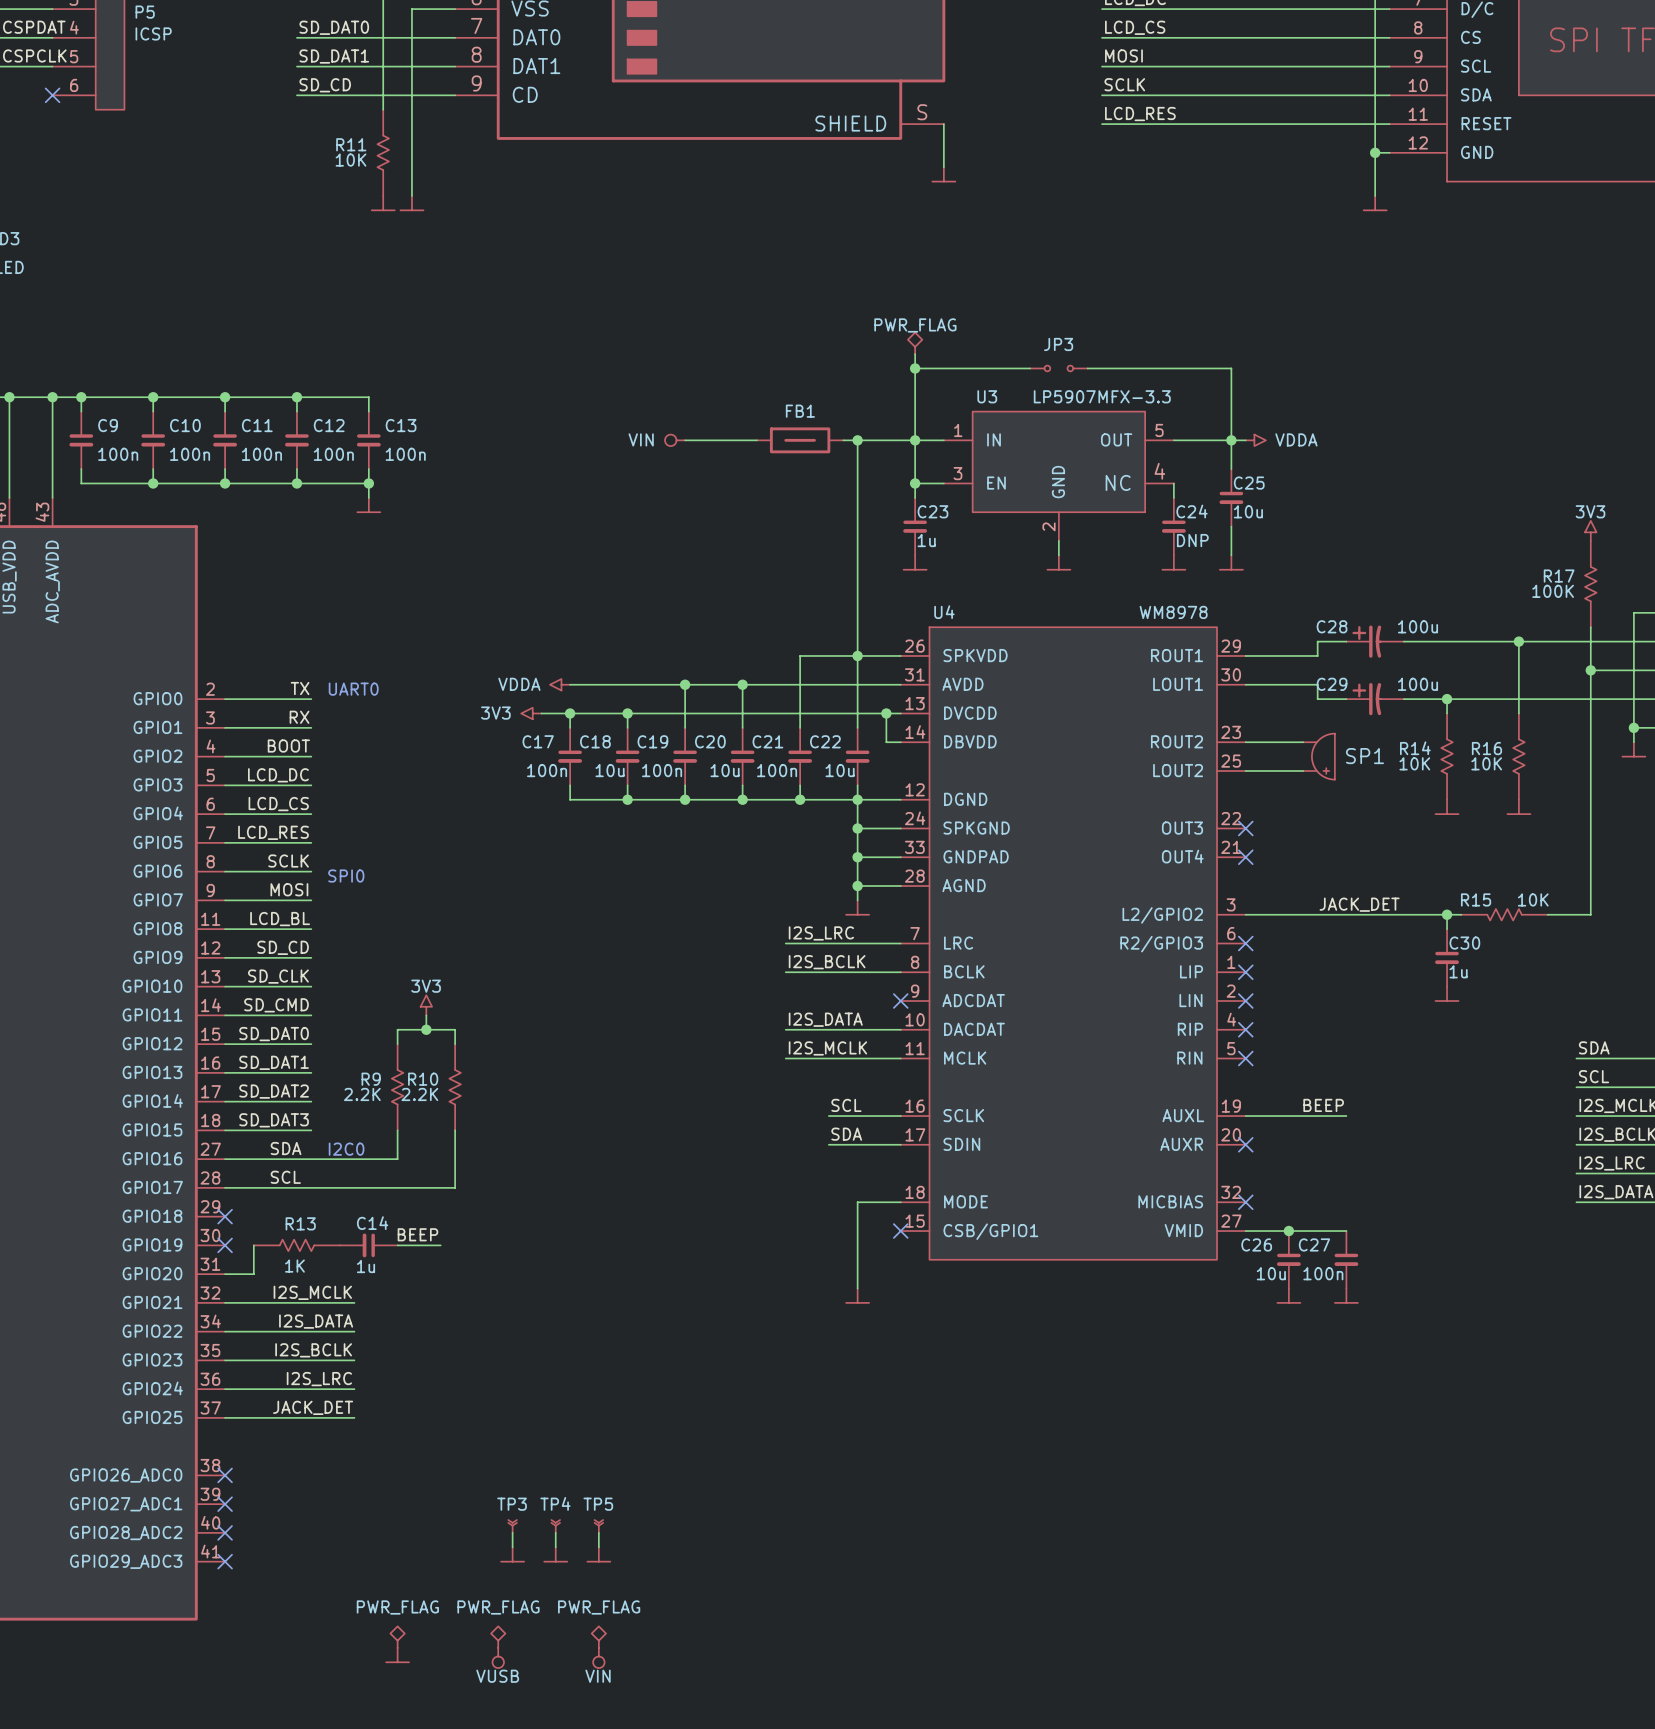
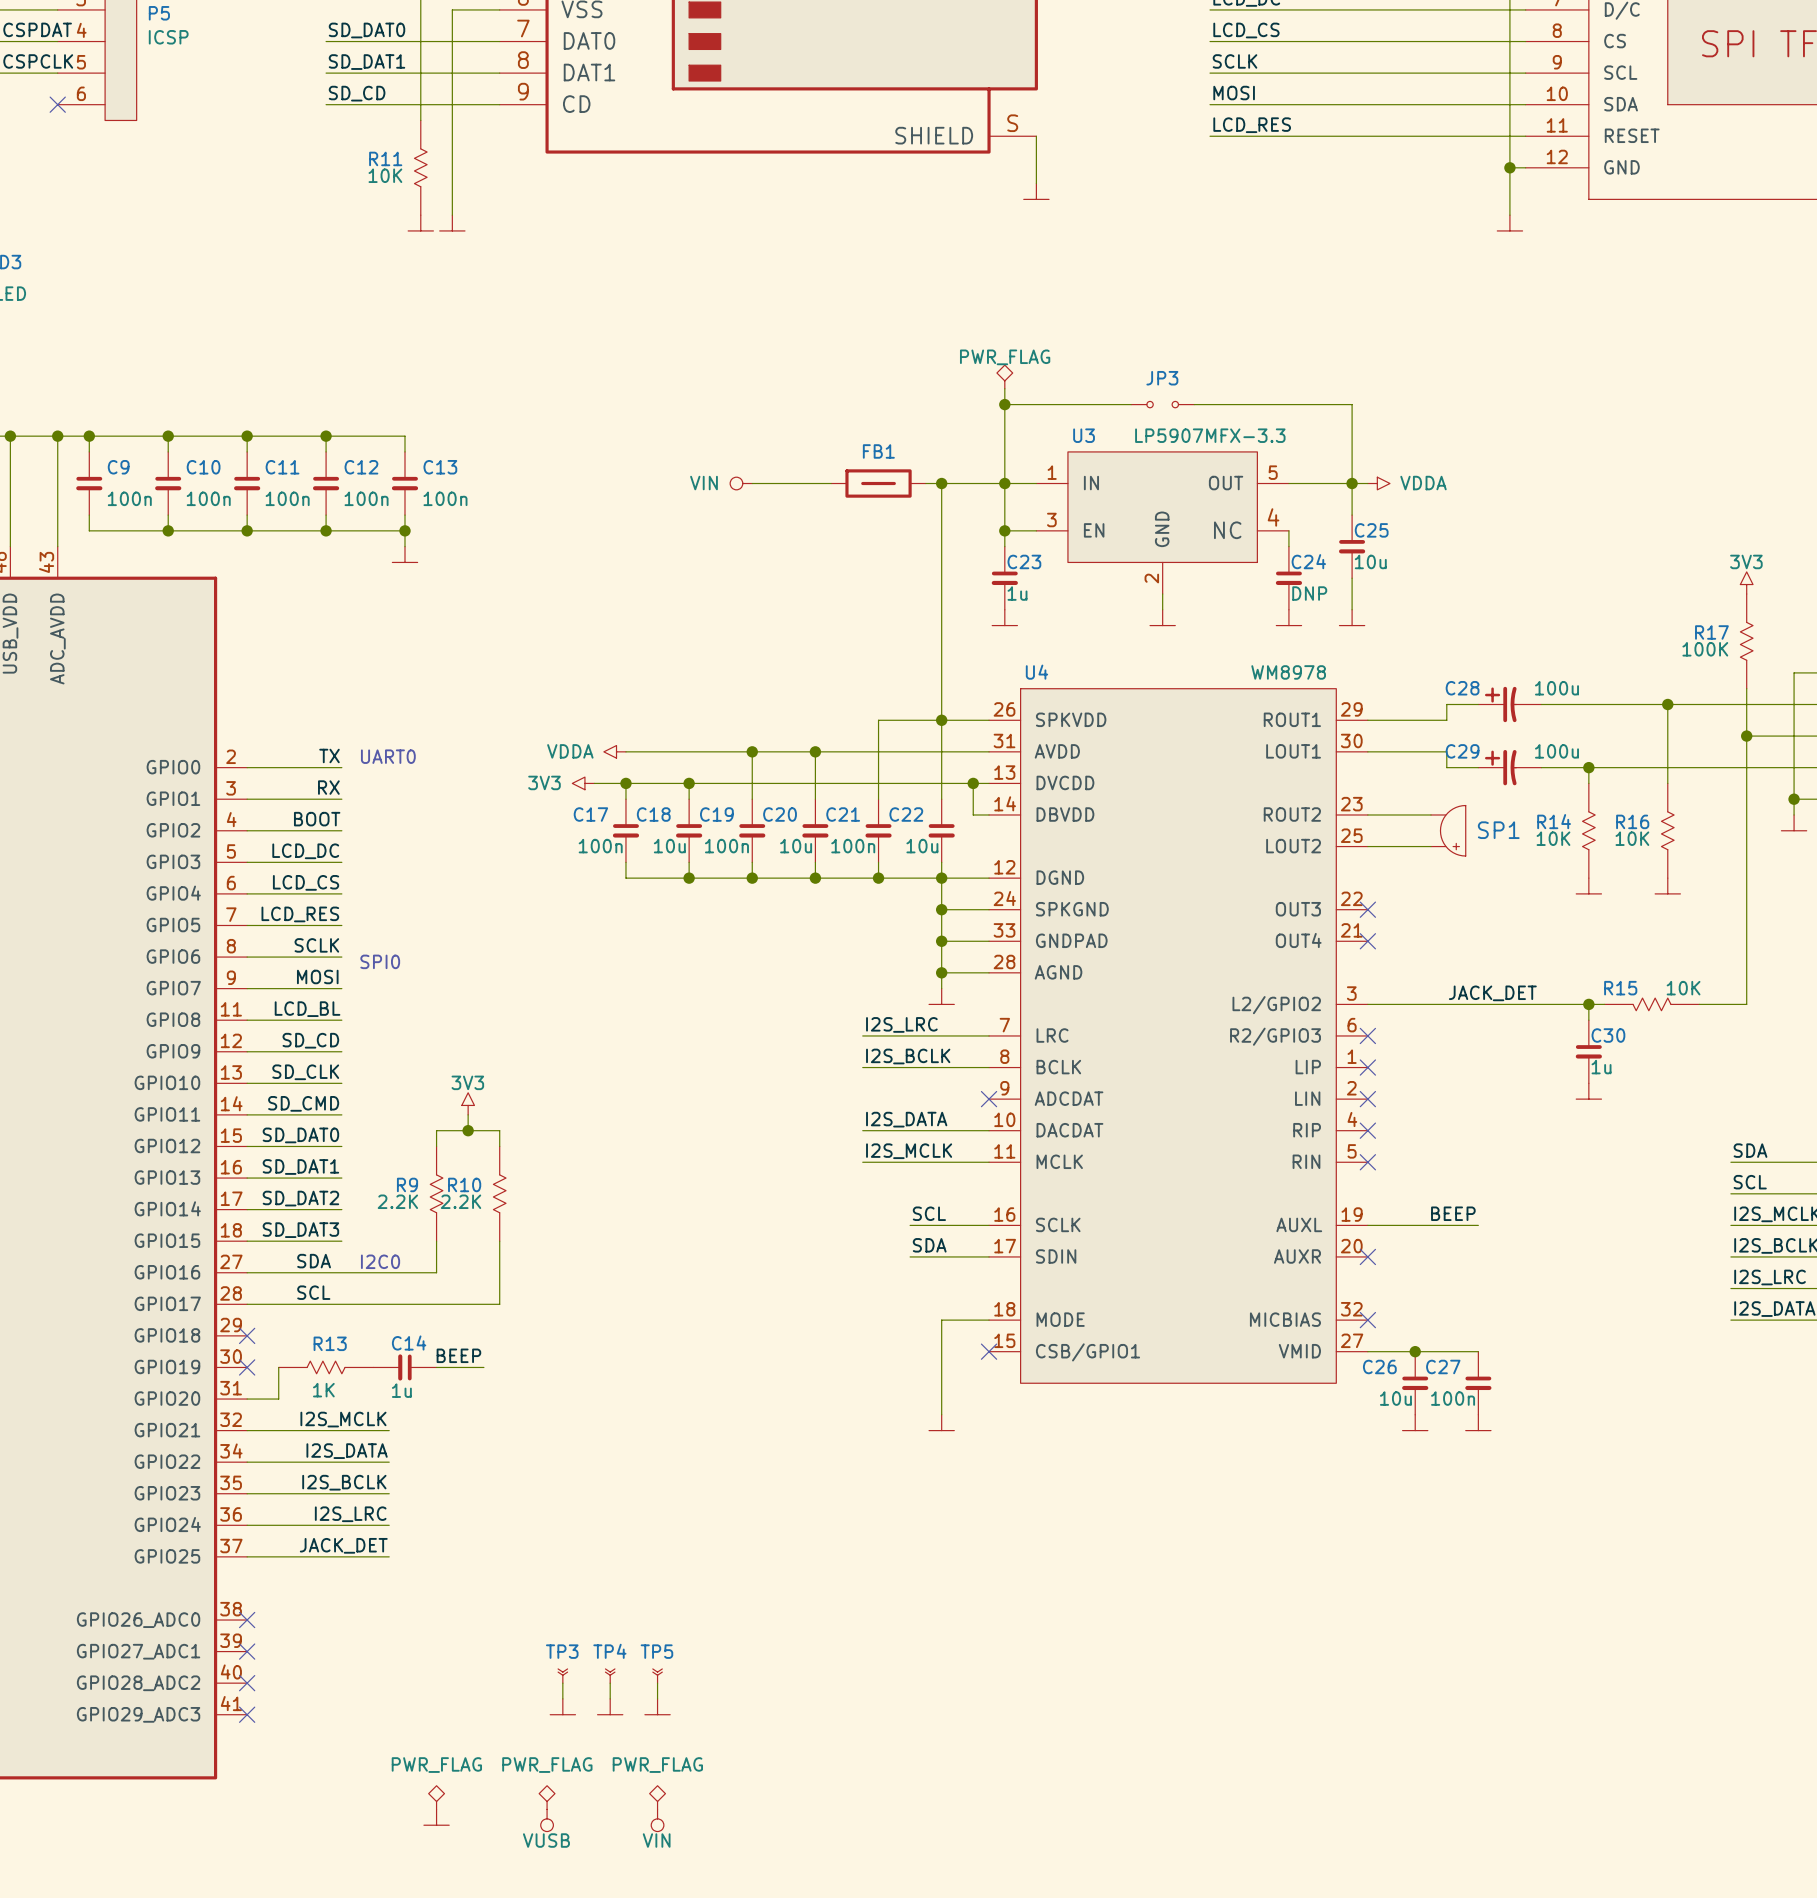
label: MOSI (1123, 55) -> SCLK (1235, 61)
label: SCLK (1124, 84) -> MOSI (1234, 93)

